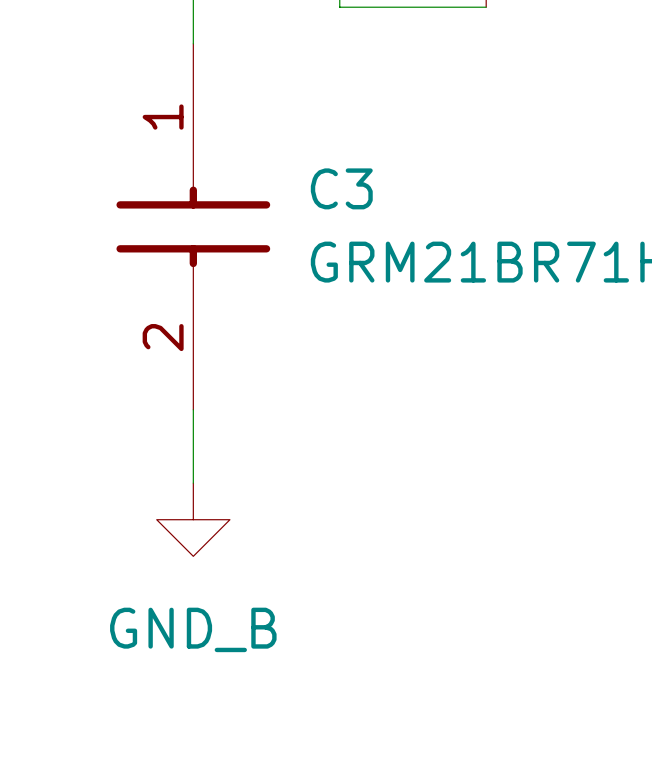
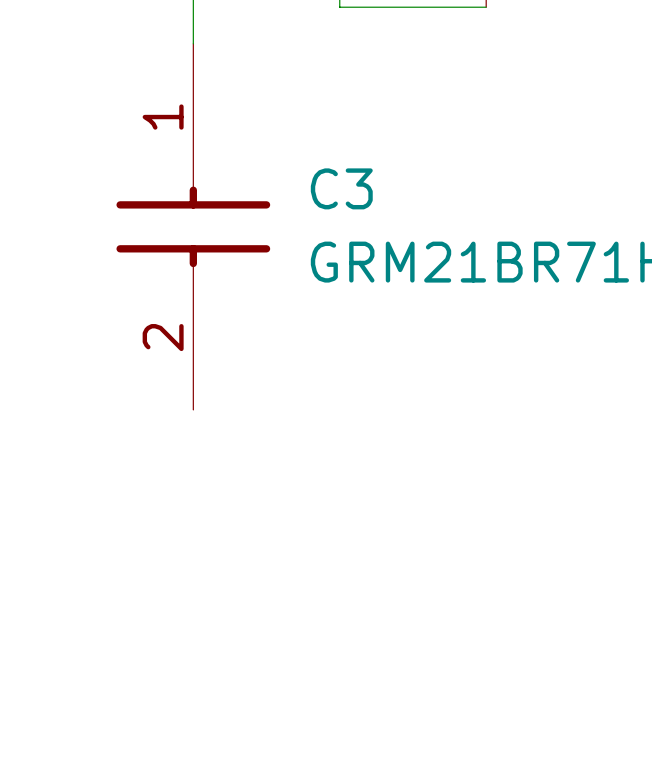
wire: (193, 409) (193, 483) -> none
power symbol: GND_B (193, 519) -> none

